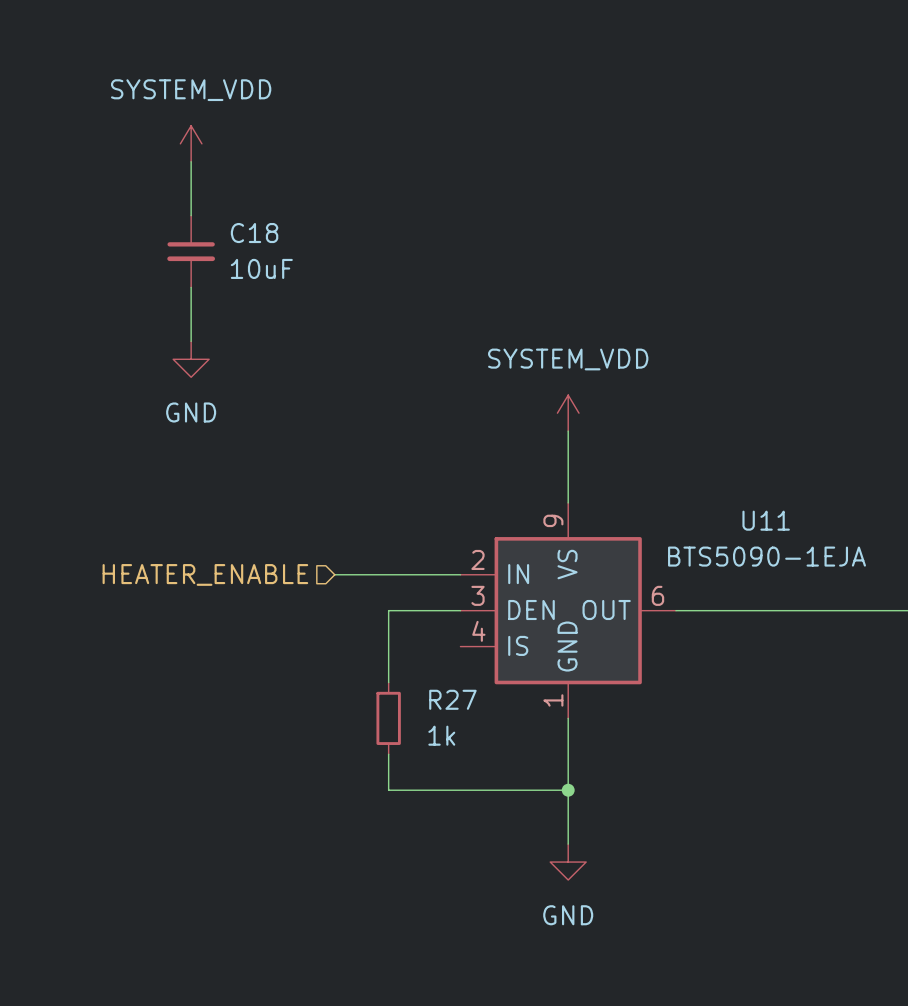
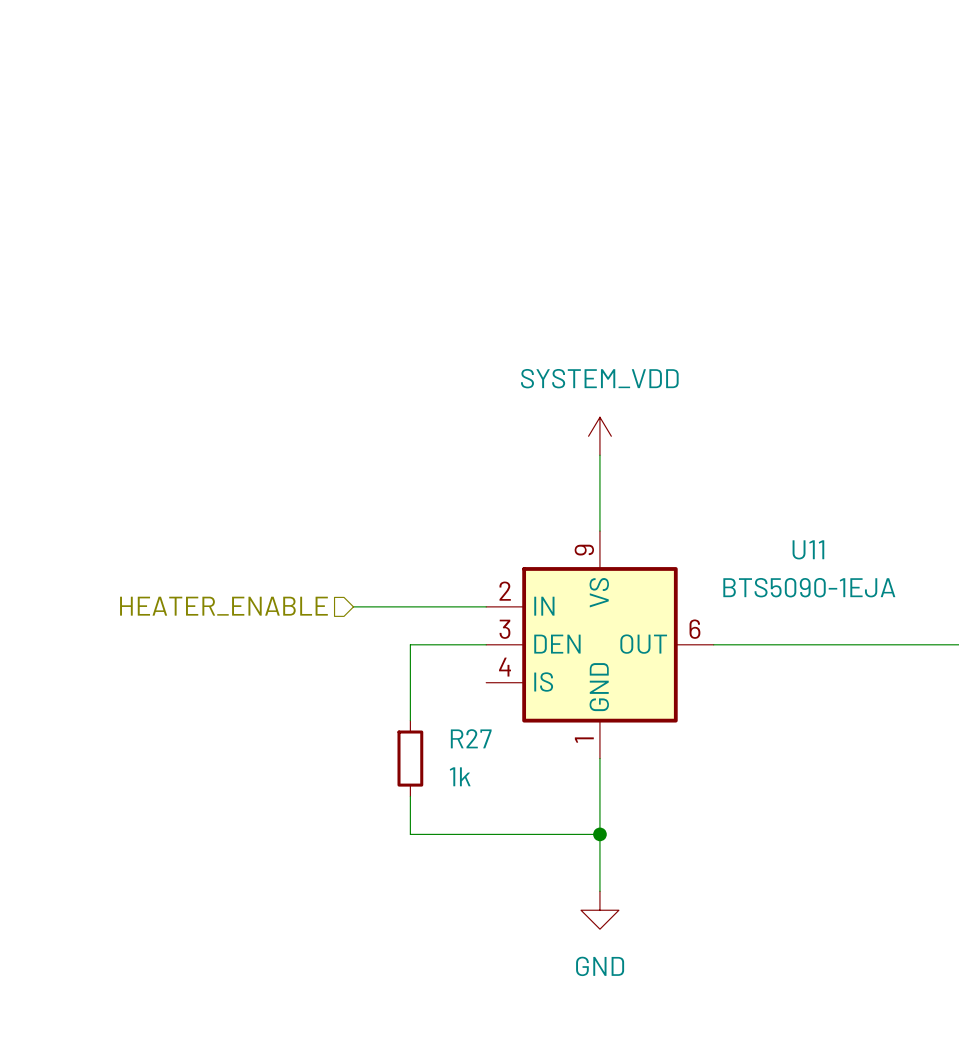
power symbol: SYSTEM_VDD (191, 143) -> none
wire: (191, 161) (191, 215) -> none
C18: 10uF (191, 251) -> none
wire: (191, 287) (191, 341) -> none
power symbol: GND (191, 359) -> none

